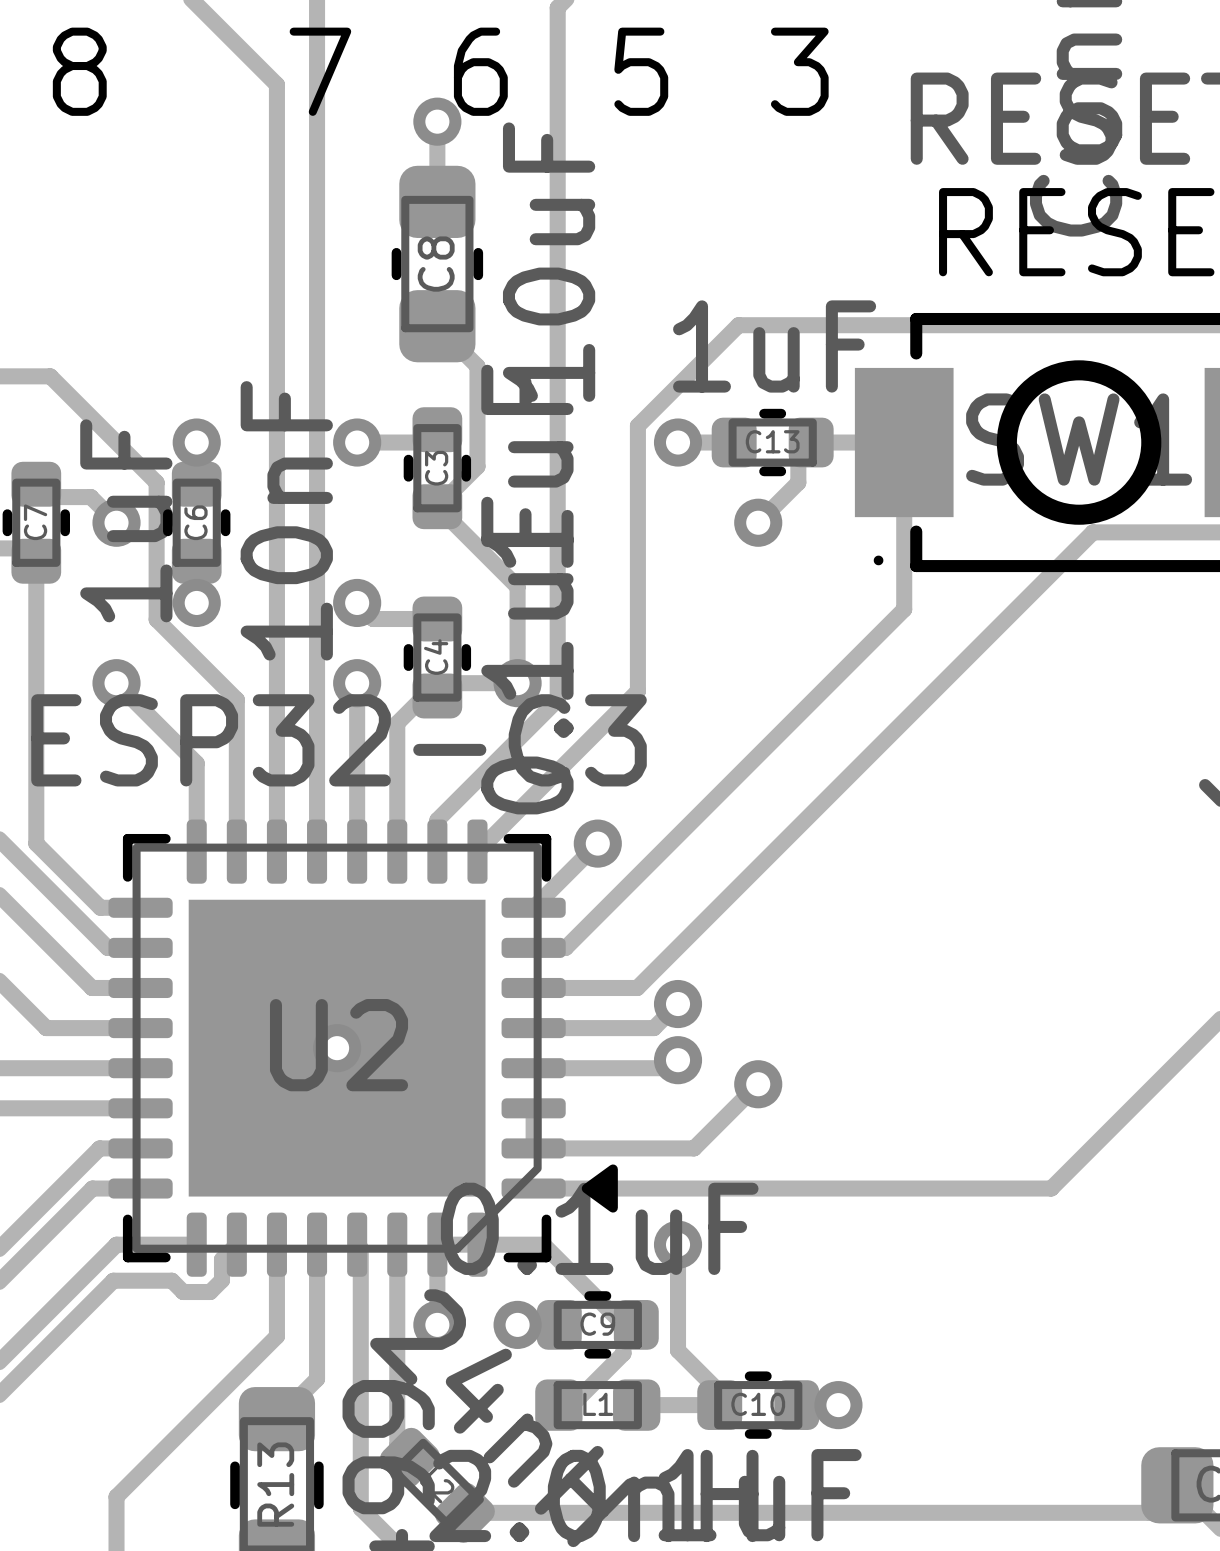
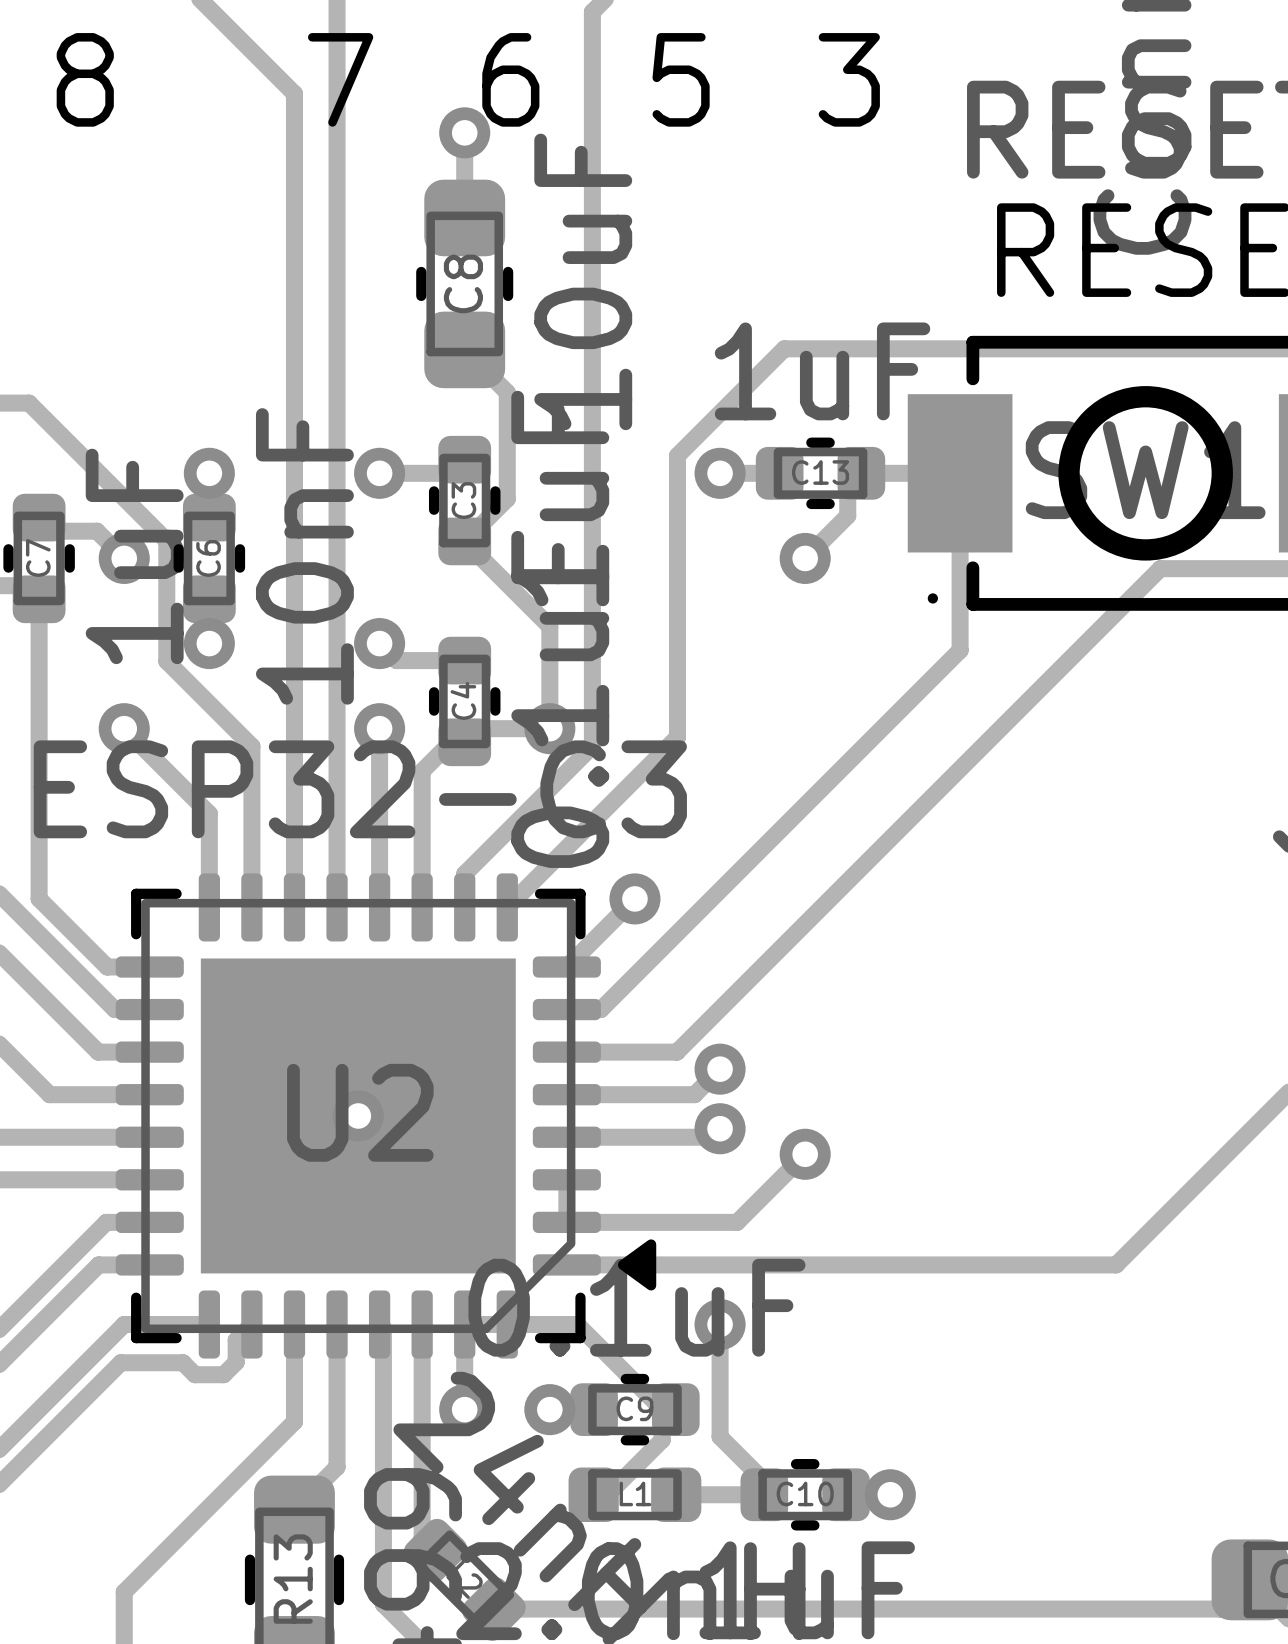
track: (26, 376) (50, 376) (156, 482) (156, 506) -> (29, 403) (166, 540)

